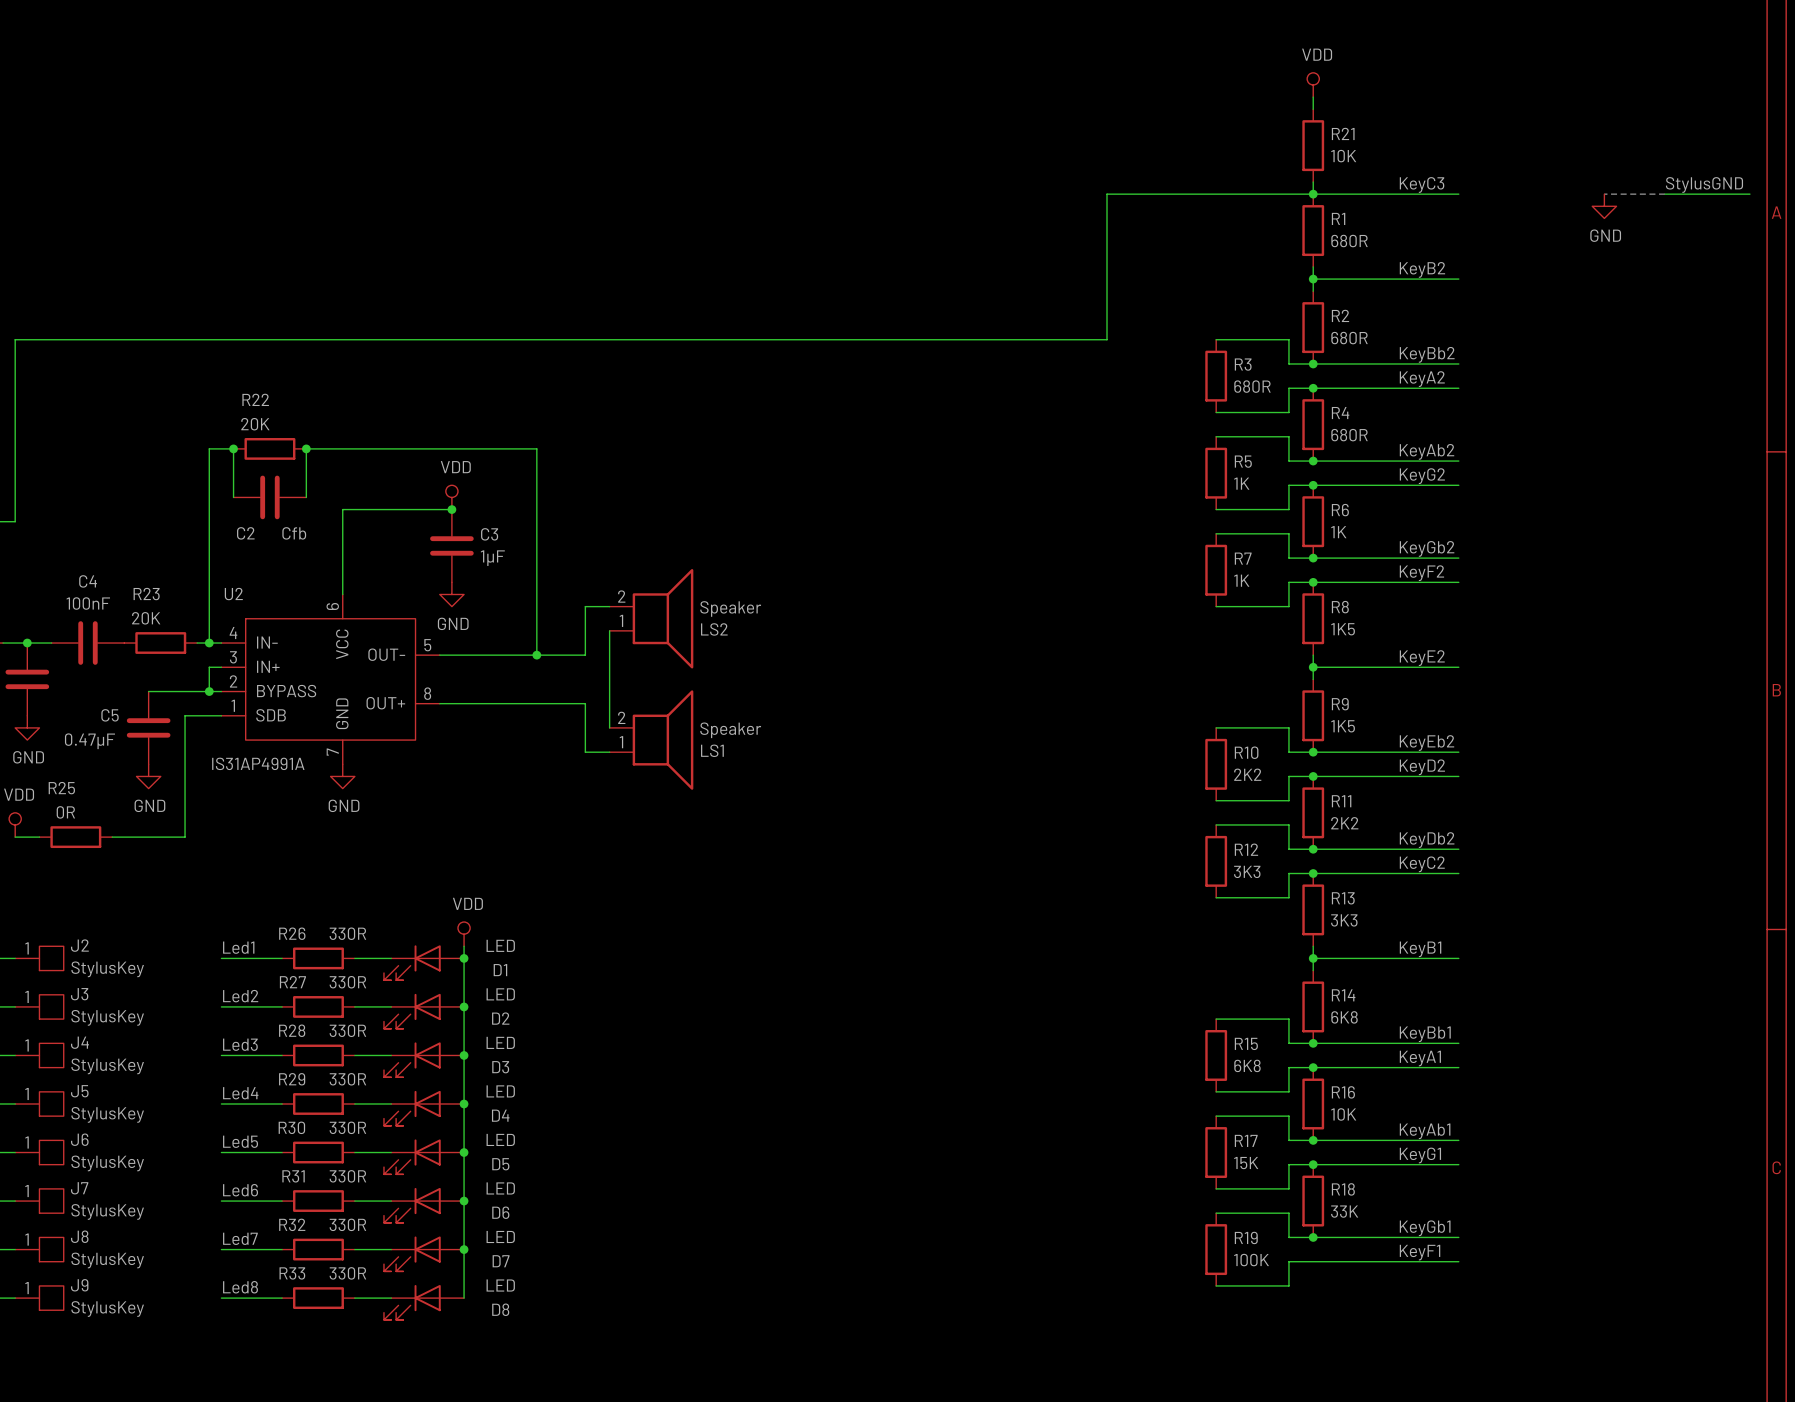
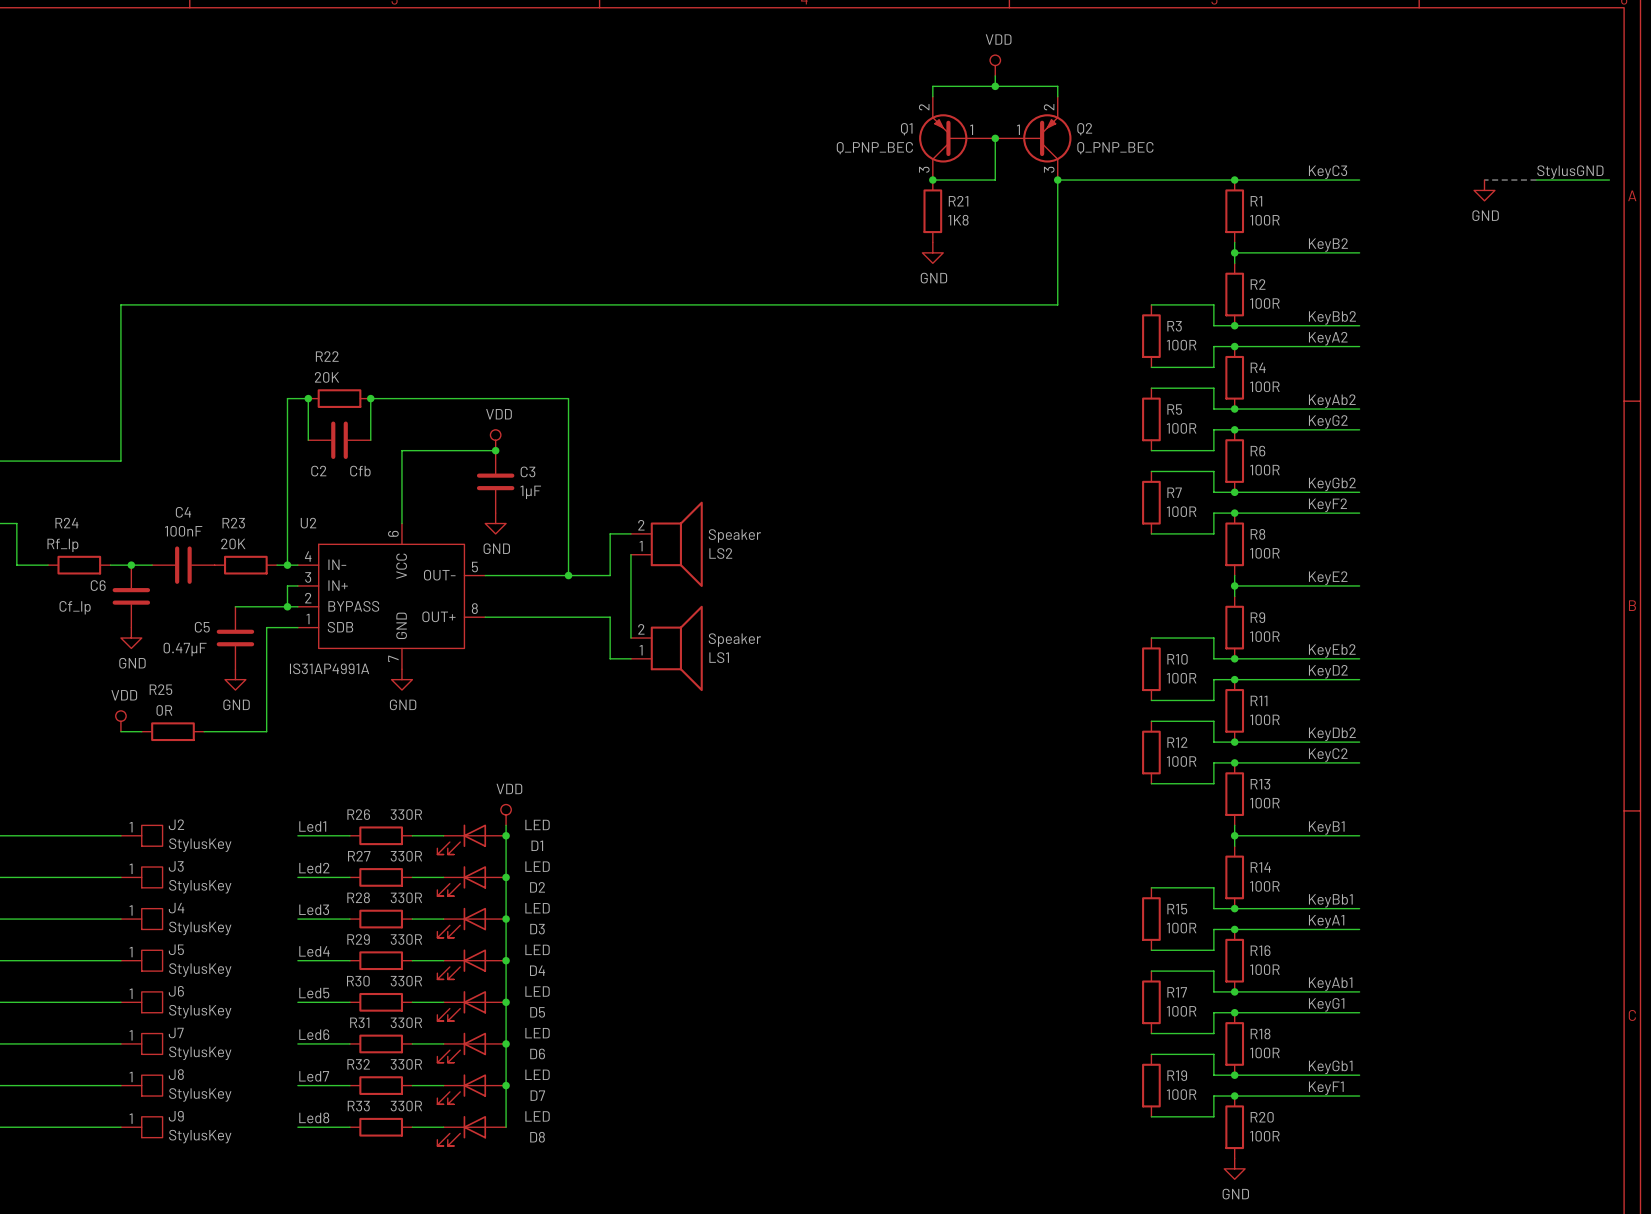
power symbol: none -> VDD (995, 65)
wire: none -> (995, 75) (995, 86)
junction: none -> (995, 86)
power symbol: VDD (1313, 84) -> none
wire: none -> (932, 96) (932, 86) (1057, 86) (1057, 96)
wire: (1313, 97) (1313, 109) -> none
Q1: none -> Q_PNP_BEC (957, 138)
wire: none -> (995, 138) (995, 180) (932, 180)
junction: none -> (995, 138)
Q2: none -> Q_PNP_BEC (1033, 138)
R21 position: (1313, 145) -> (932, 211)
R21 value: 10K (1343, 156) -> 1K8 (958, 220)
wire: (1313, 182) (1313, 194) -> none
junction: none -> (932, 180)
junction: none -> (1057, 180)
R1 value: 680R (1349, 241) -> 100R (1264, 220)
power symbol: none -> GND (932, 252)
R2 value: 680R (1349, 338) -> 100R (1264, 303)
R3 value: 680R (1252, 386) -> 100R (1181, 345)
R4 value: 680R (1349, 435) -> 100R (1264, 386)
R5 value: 1K (1241, 483) -> 100R (1181, 428)
R6 value: 1K (1338, 532) -> 100R (1264, 470)
R7 value: 1K (1241, 580) -> 100R (1181, 511)
R8 value: 1K5 (1343, 629) -> 100R (1264, 553)
R9 value: 1K5 (1343, 726) -> 100R (1264, 636)
R10 value: 2K2 (1247, 774) -> 100R (1181, 678)
R11 value: 2K2 (1344, 823) -> 100R (1264, 719)
R12 value: 3K3 (1247, 871) -> 100R (1181, 761)
R13 value: 3K3 (1344, 920) -> 100R (1264, 803)
R14 value: 6K8 (1344, 1017) -> 100R (1264, 886)
R15 value: 6K8 (1247, 1065) -> 100R (1181, 928)
R16 value: 10K (1343, 1114) -> 100R (1264, 969)
R17 value: 15K (1246, 1163) -> 100R (1181, 1011)
R18 value: 33K (1344, 1211) -> 100R (1264, 1052)
R19 value: 100K (1251, 1260) -> 100R (1181, 1094)
junction: none -> (1234, 1096)
R20: none -> 100R (1234, 1127)
power symbol: none -> GND (1234, 1168)

